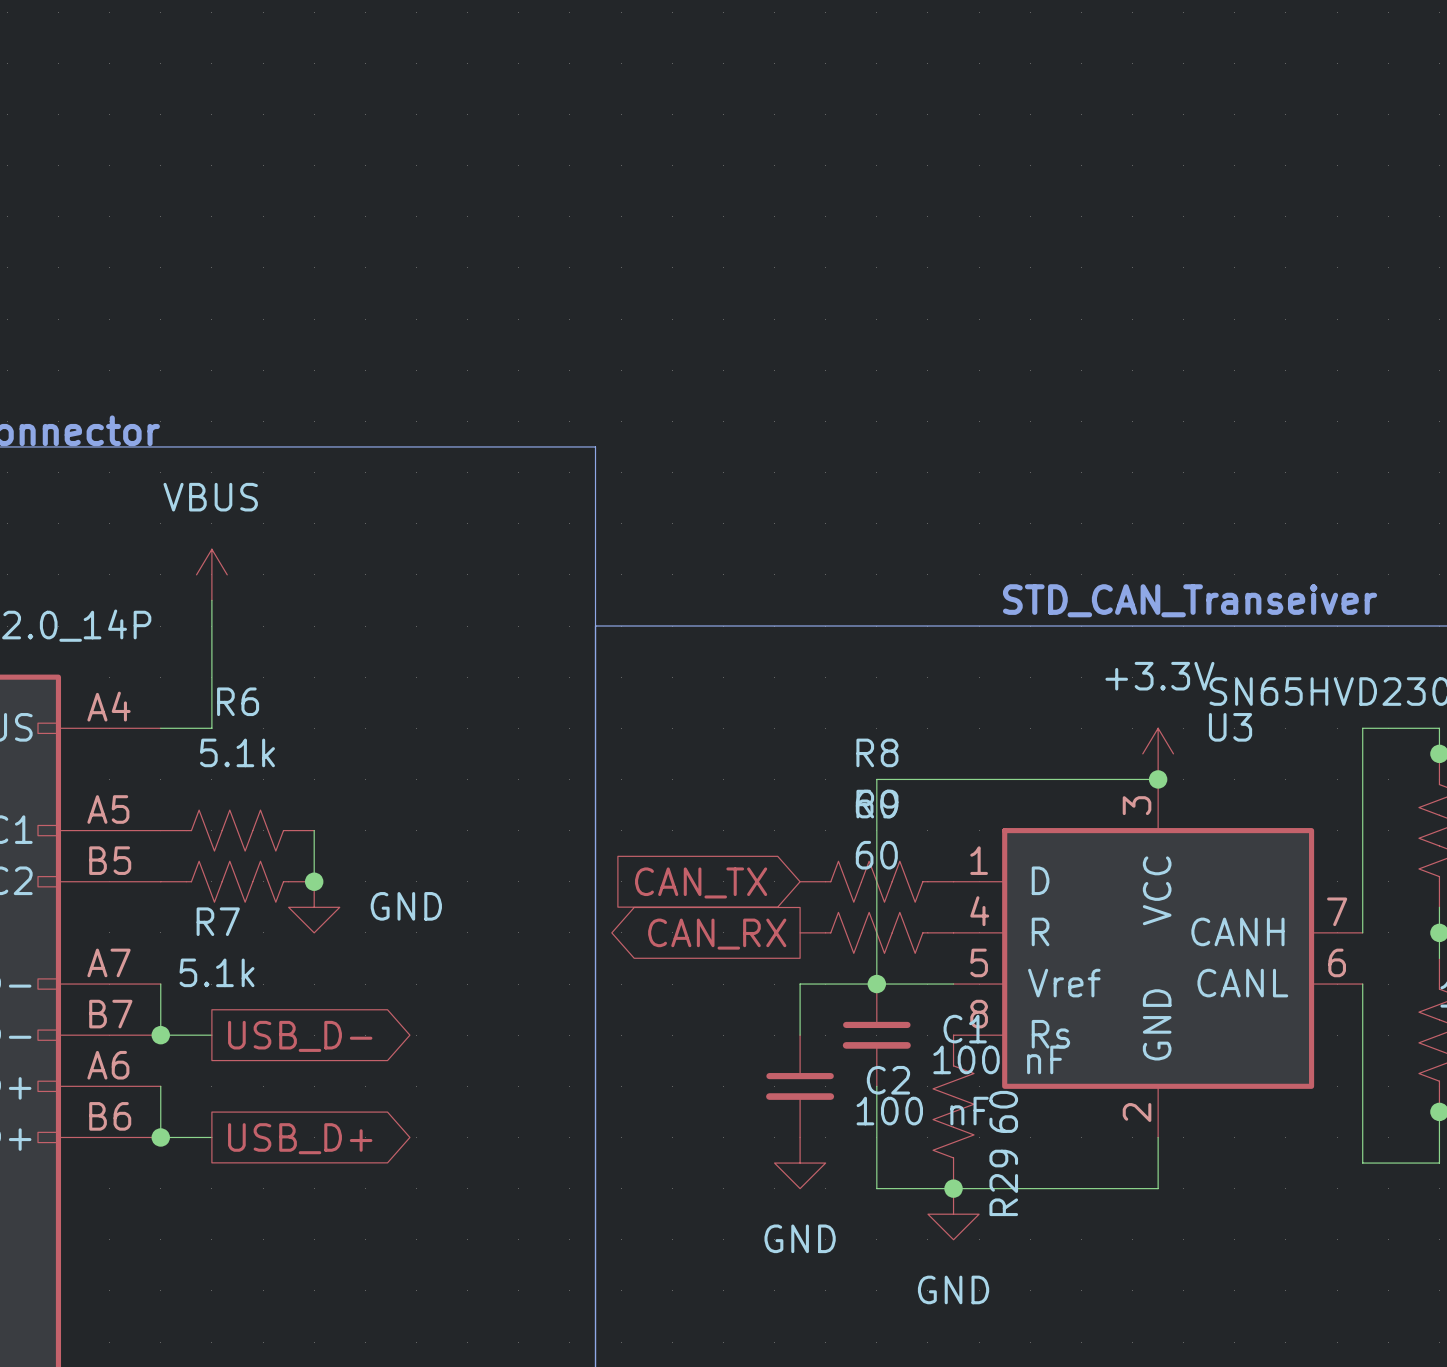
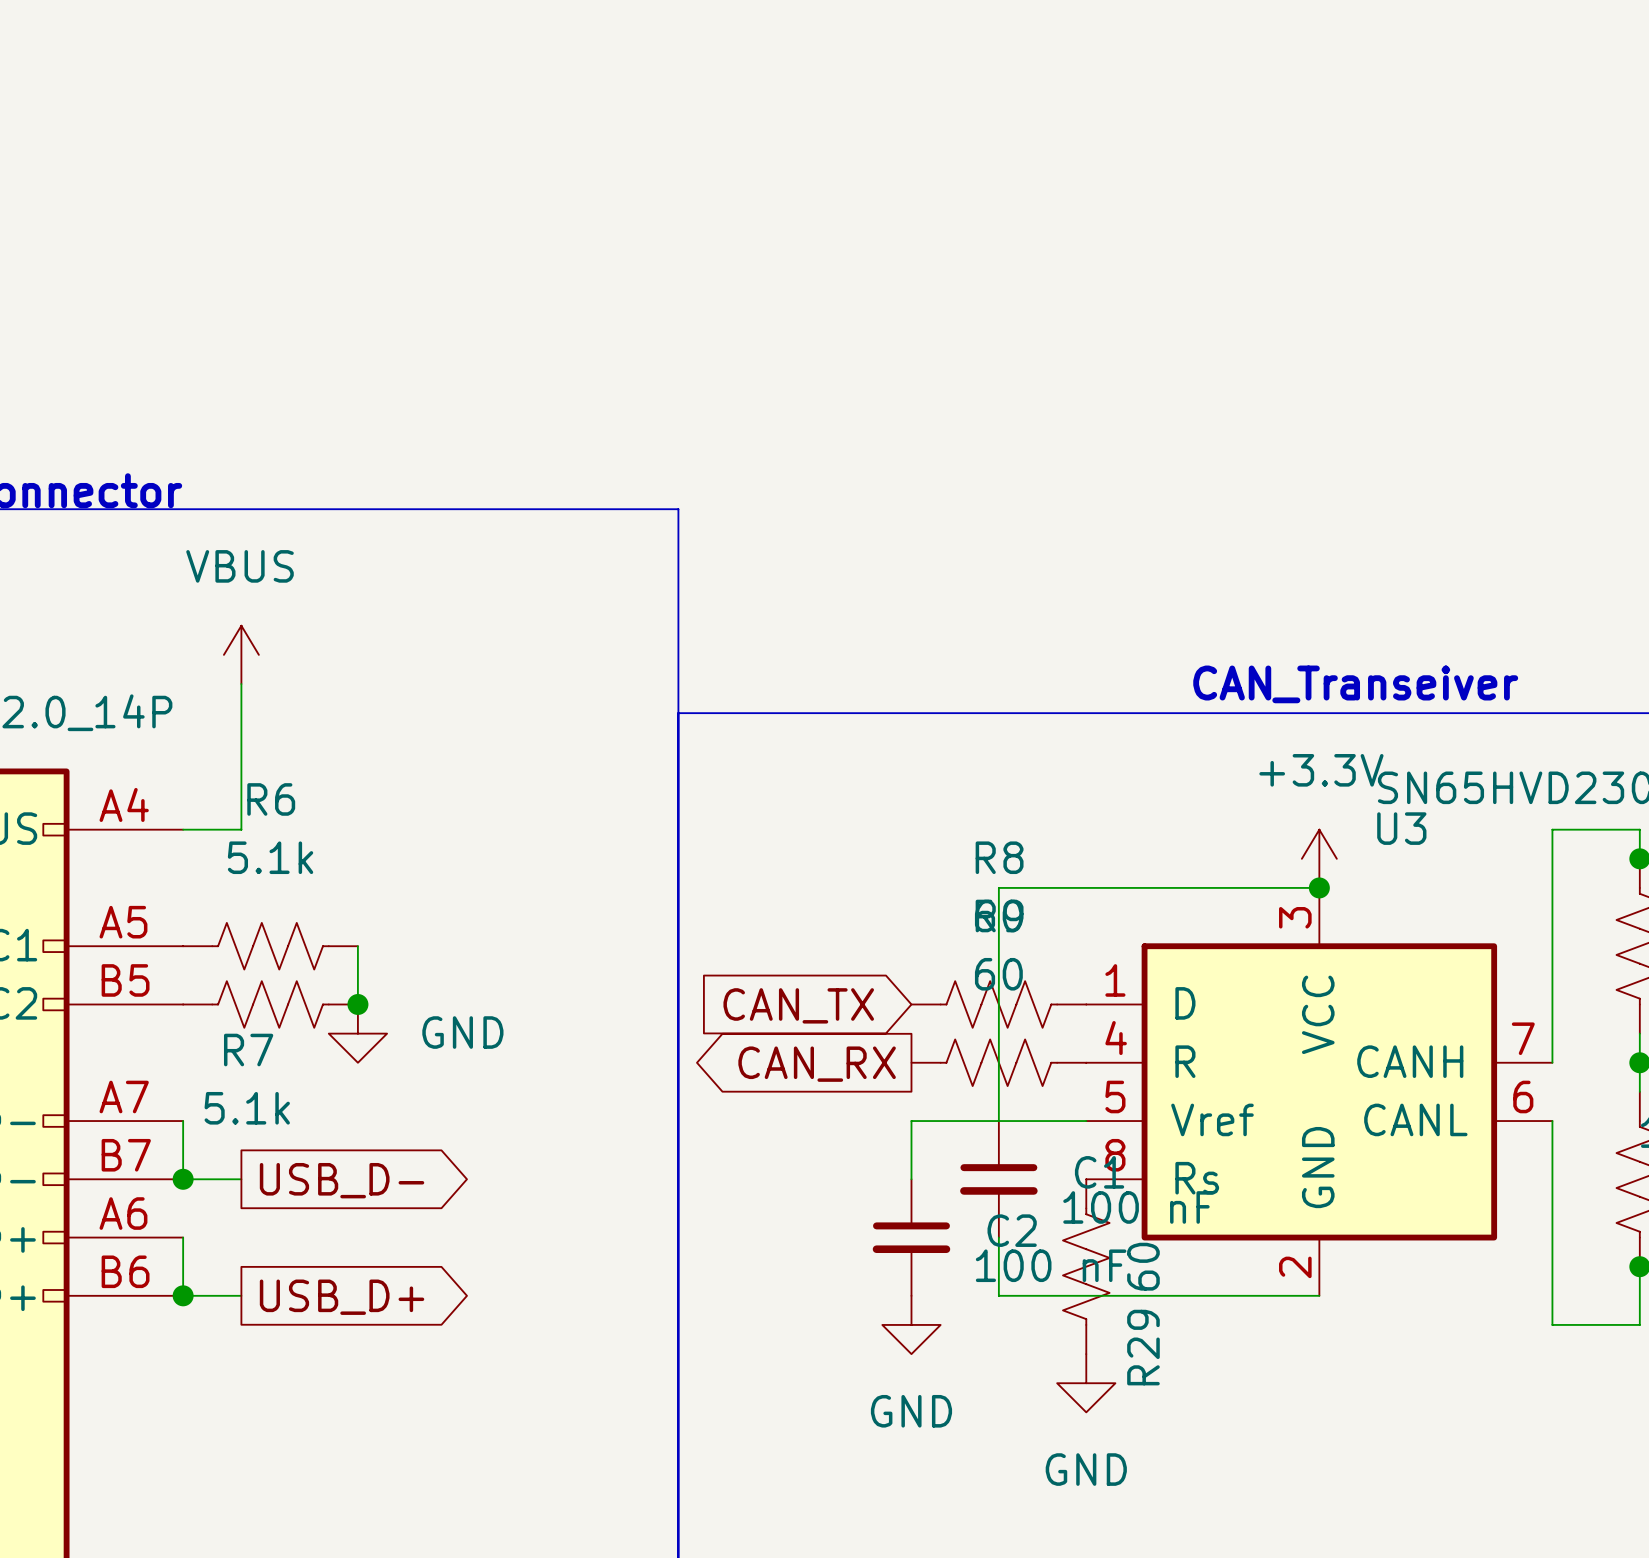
text: STD_CAN_Transeiver (1190, 600) -> CAN_Transeiver (1355, 684)
junction: (876, 984) -> none
wire: (876, 1137) (876, 1188) (1158, 1188) (1158, 1137) -> (998, 1295) (1319, 1295)
junction: (953, 1188) -> none

